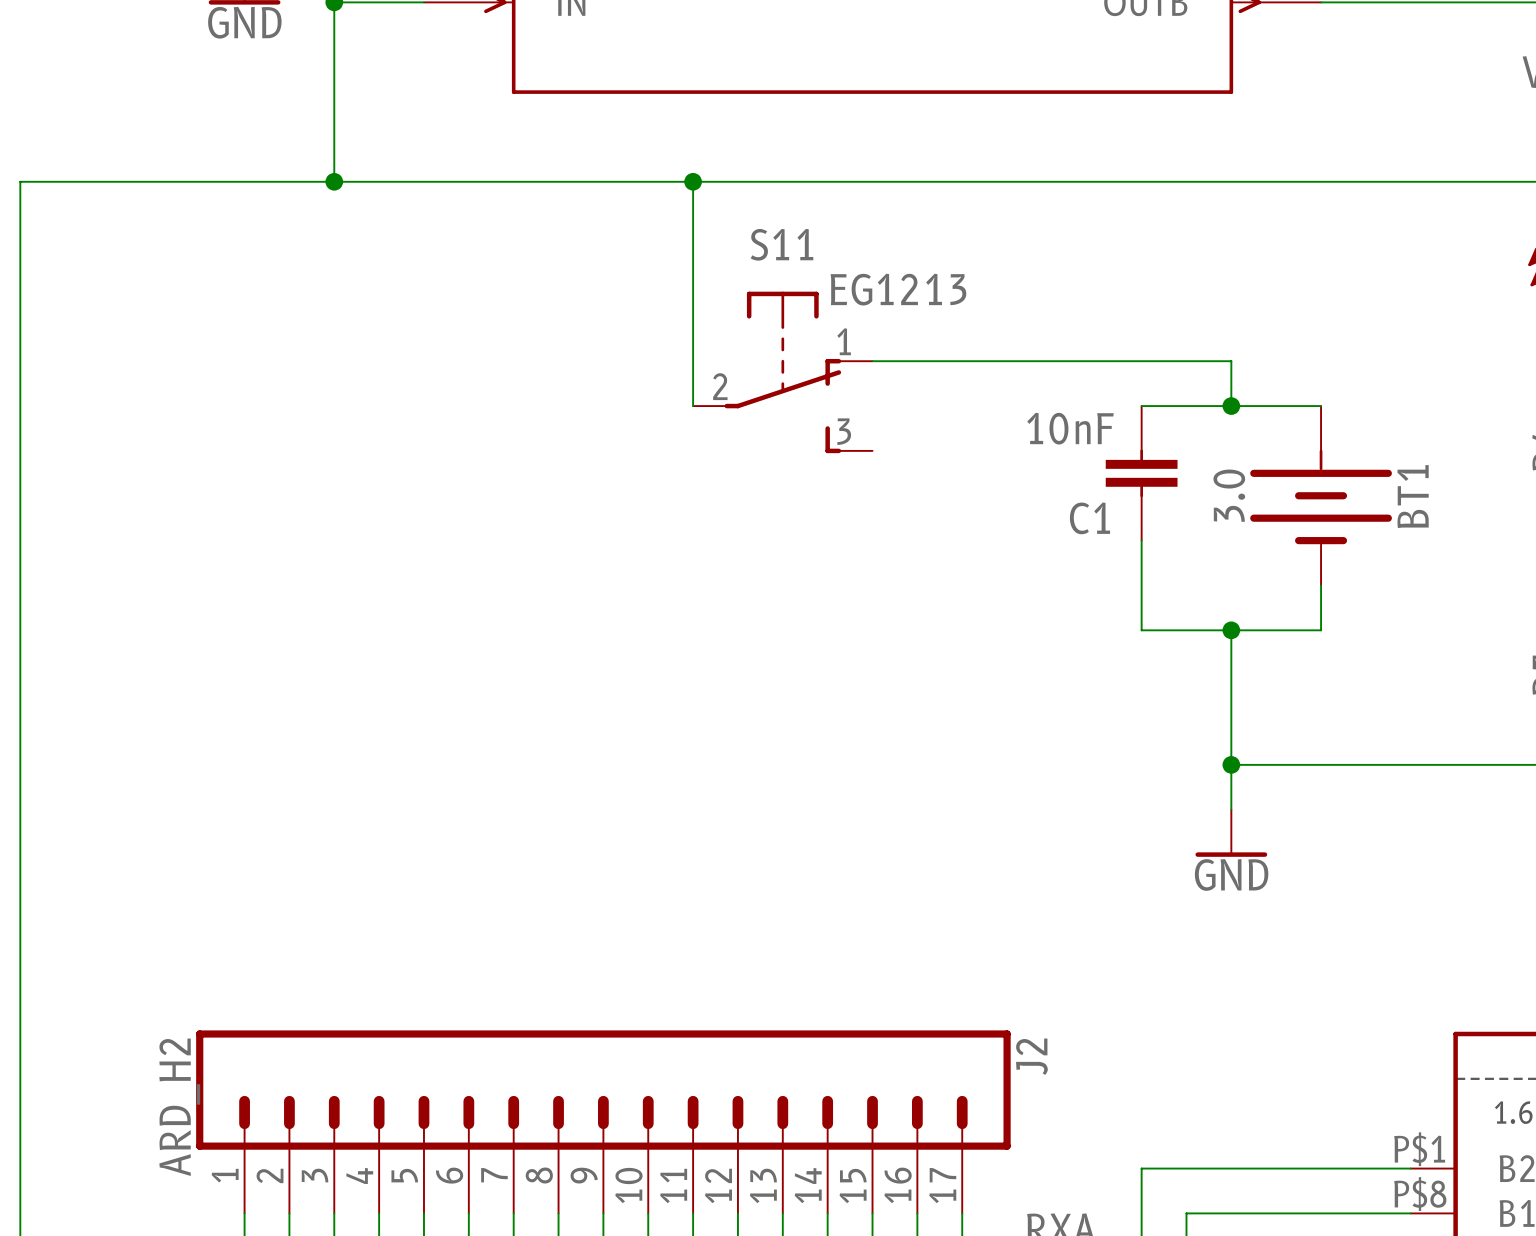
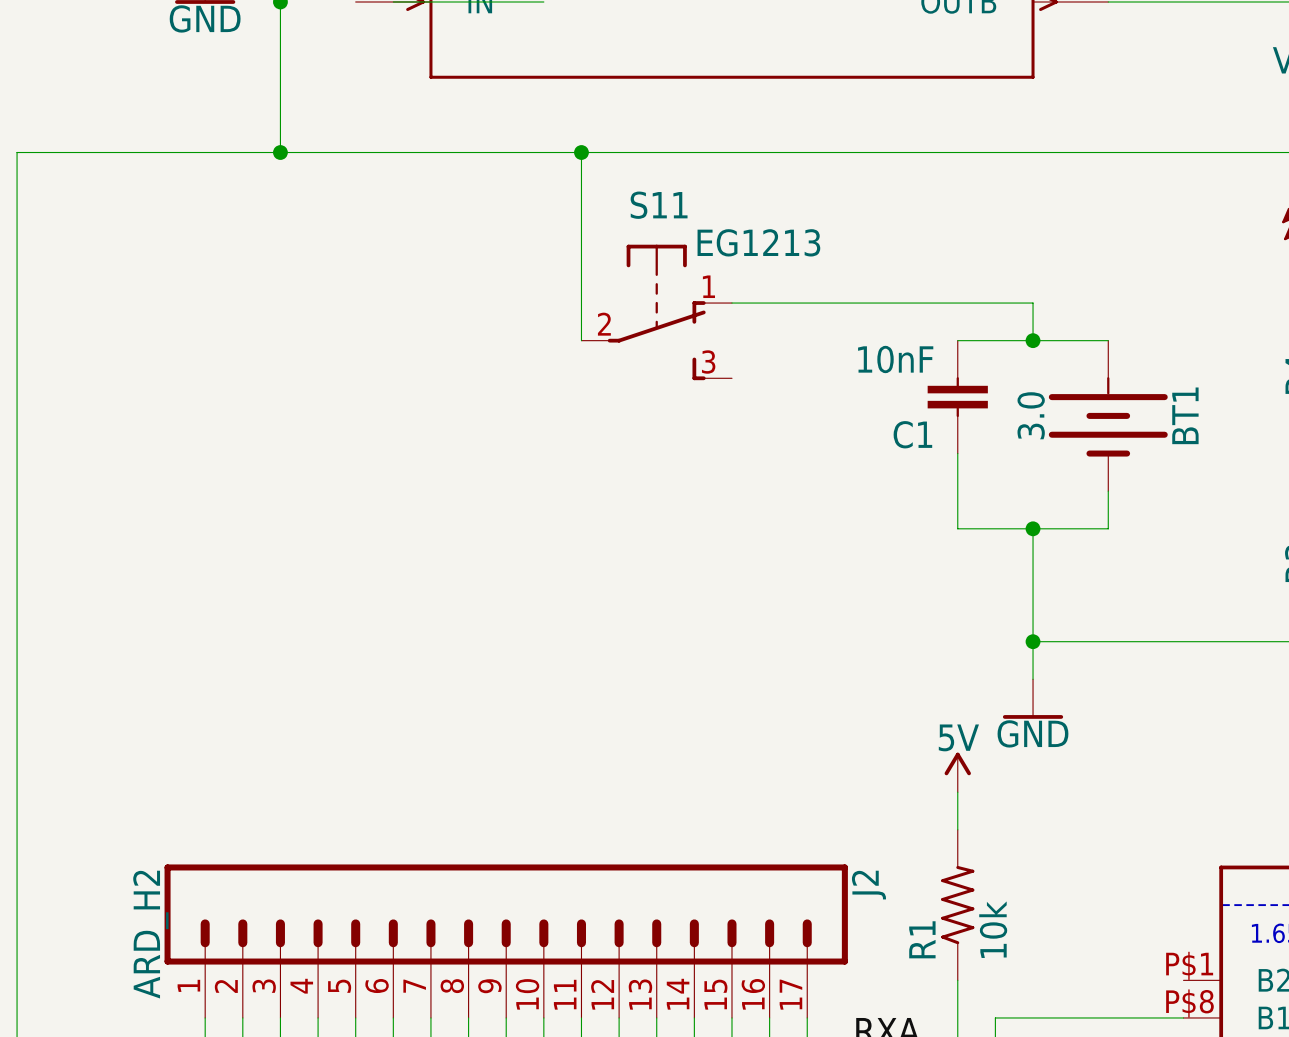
wire: (334, 2) (423, 2) -> none
wire: none -> (393, 1) (543, 1)
power symbol: none -> 5V (957, 772)
wire: none -> (957, 792) (957, 829)
R1: none -> 10k (957, 905)
wire: (1141, 1168) (1410, 1168) -> none

